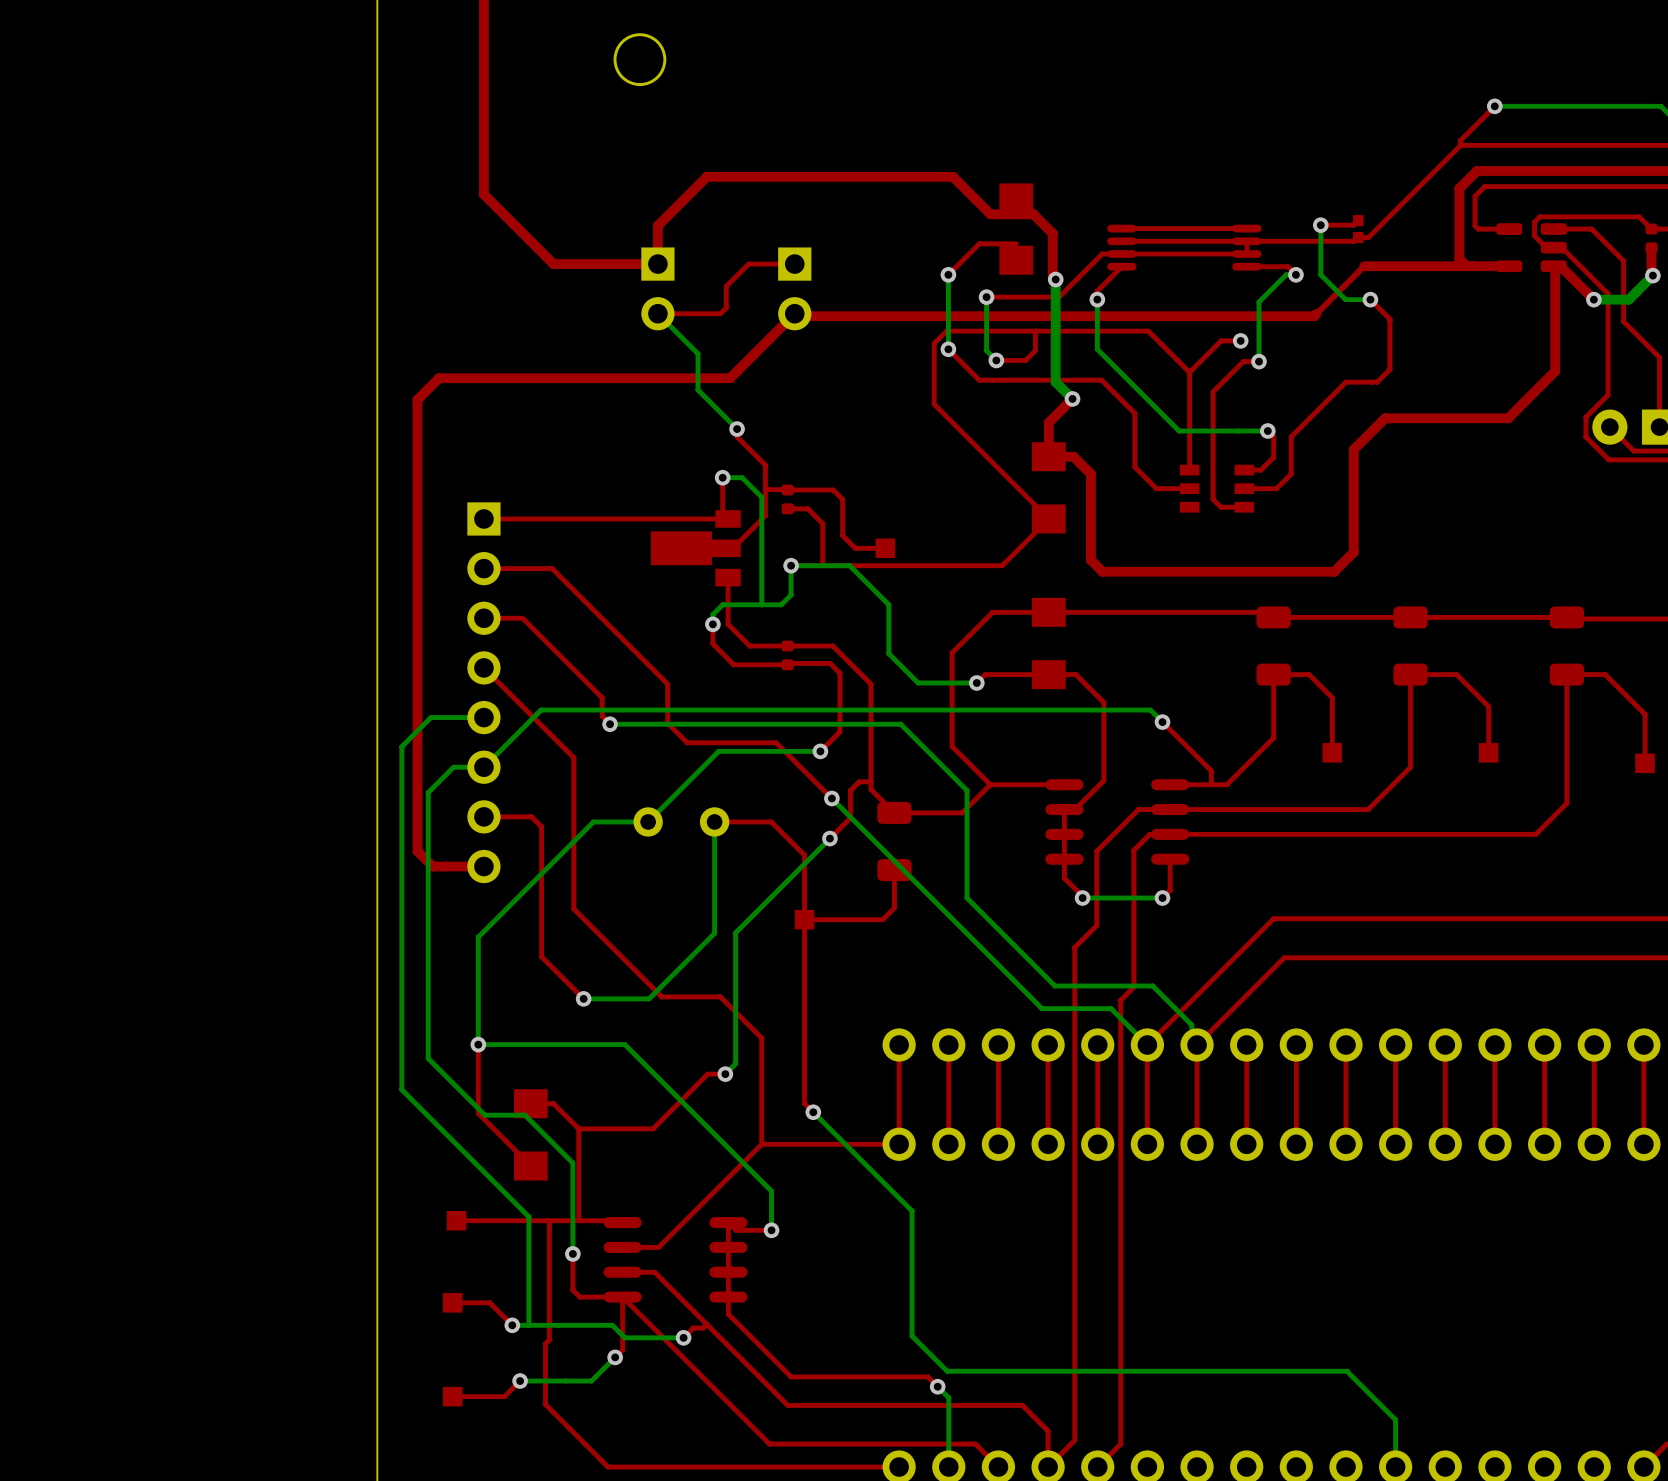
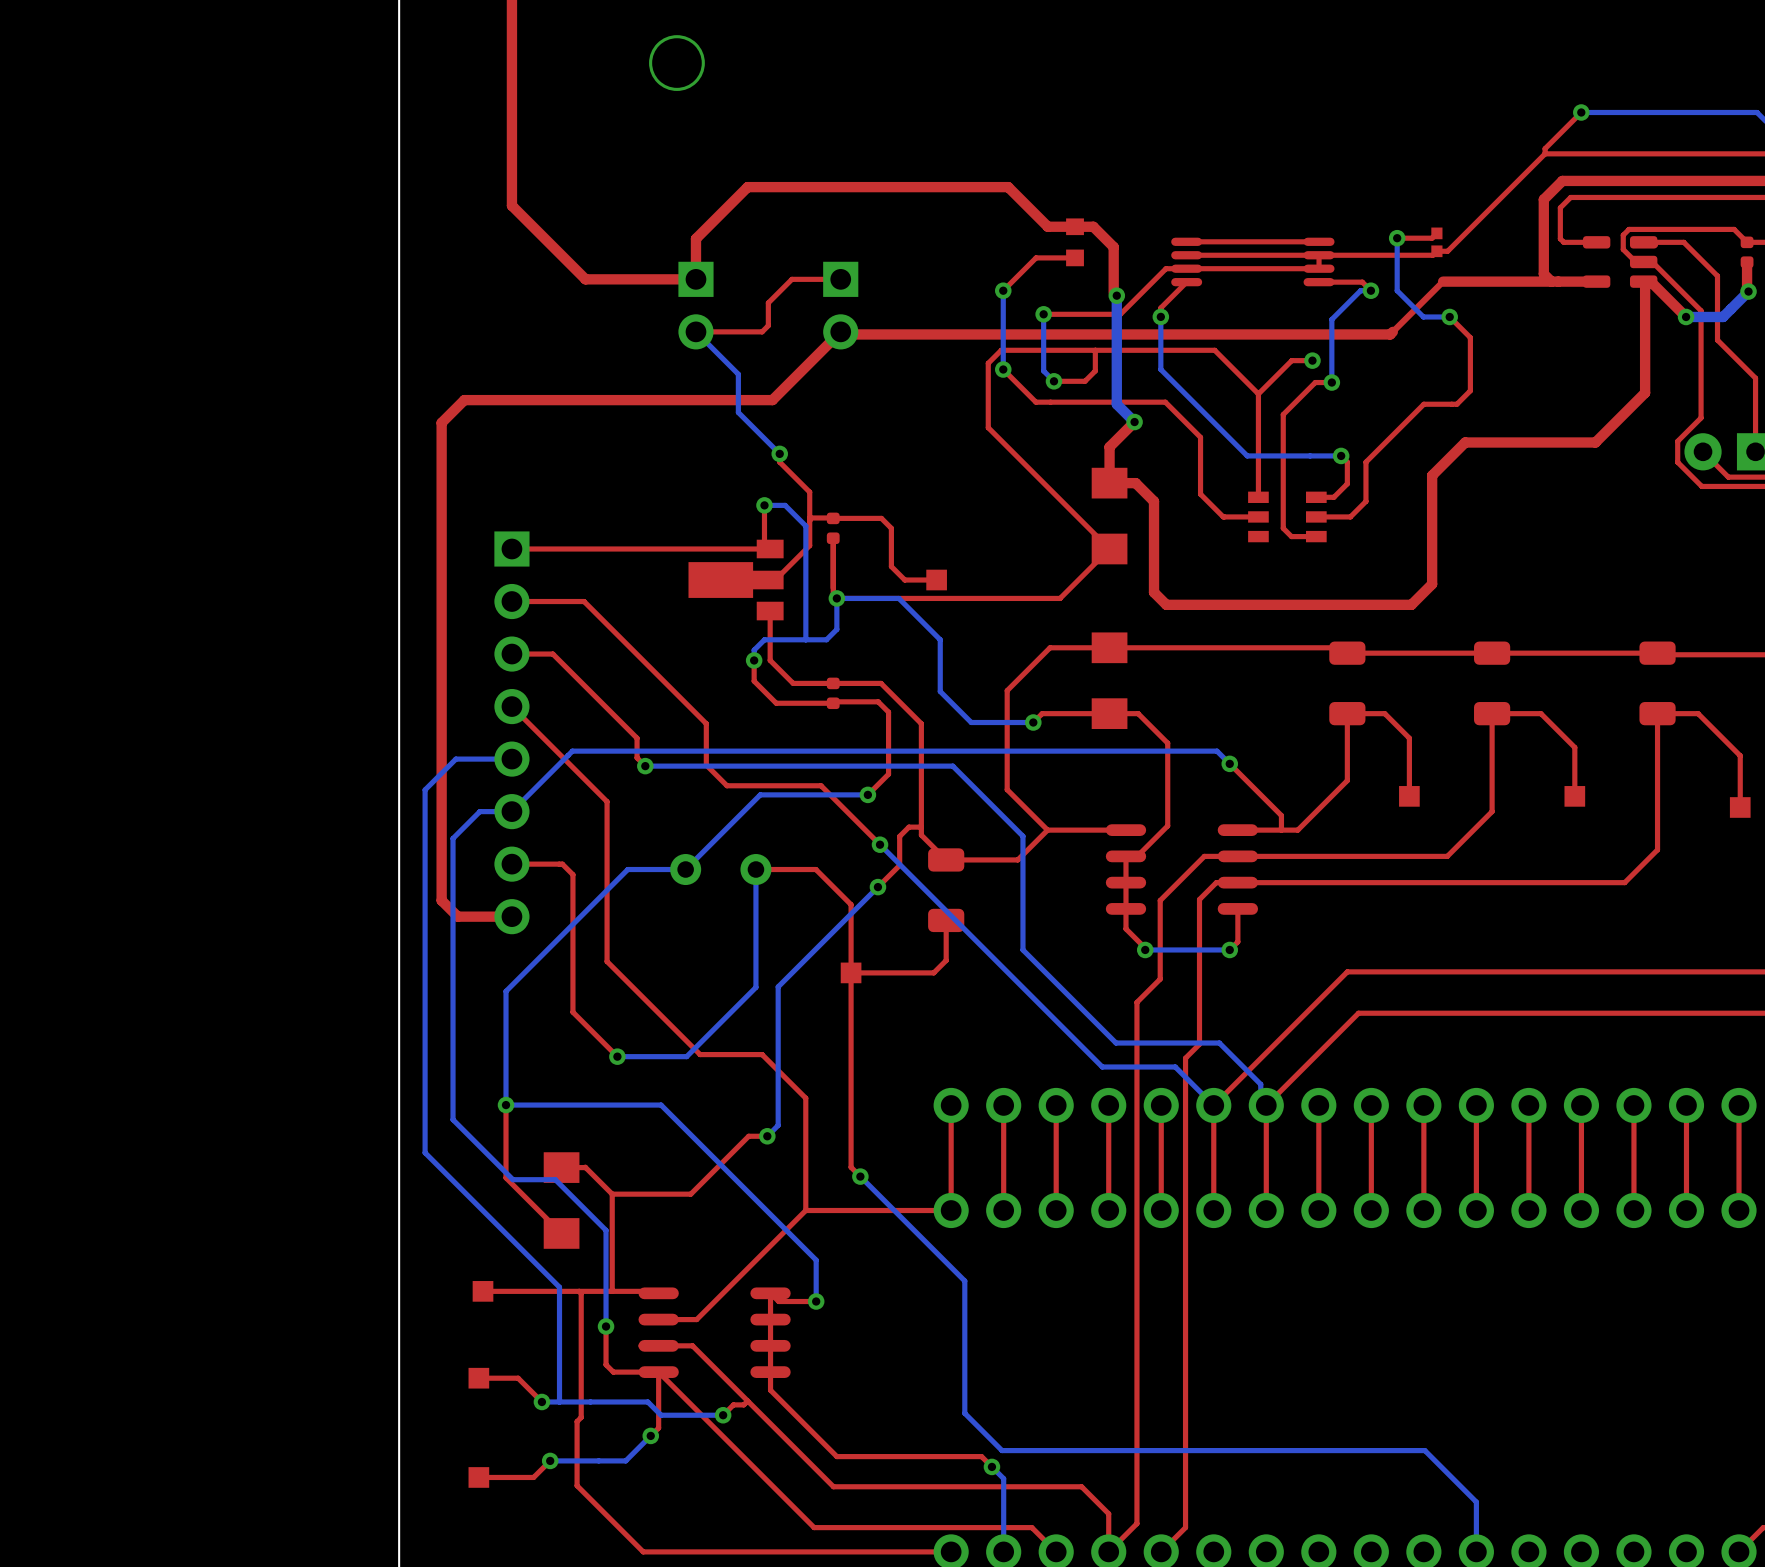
part footprint: [999, 183, 1034, 275] -> [1066, 218, 1084, 267]
top track: (787, 508) (807, 508) (822, 523) (822, 565) -> (833, 538) (833, 594) (836, 598)

